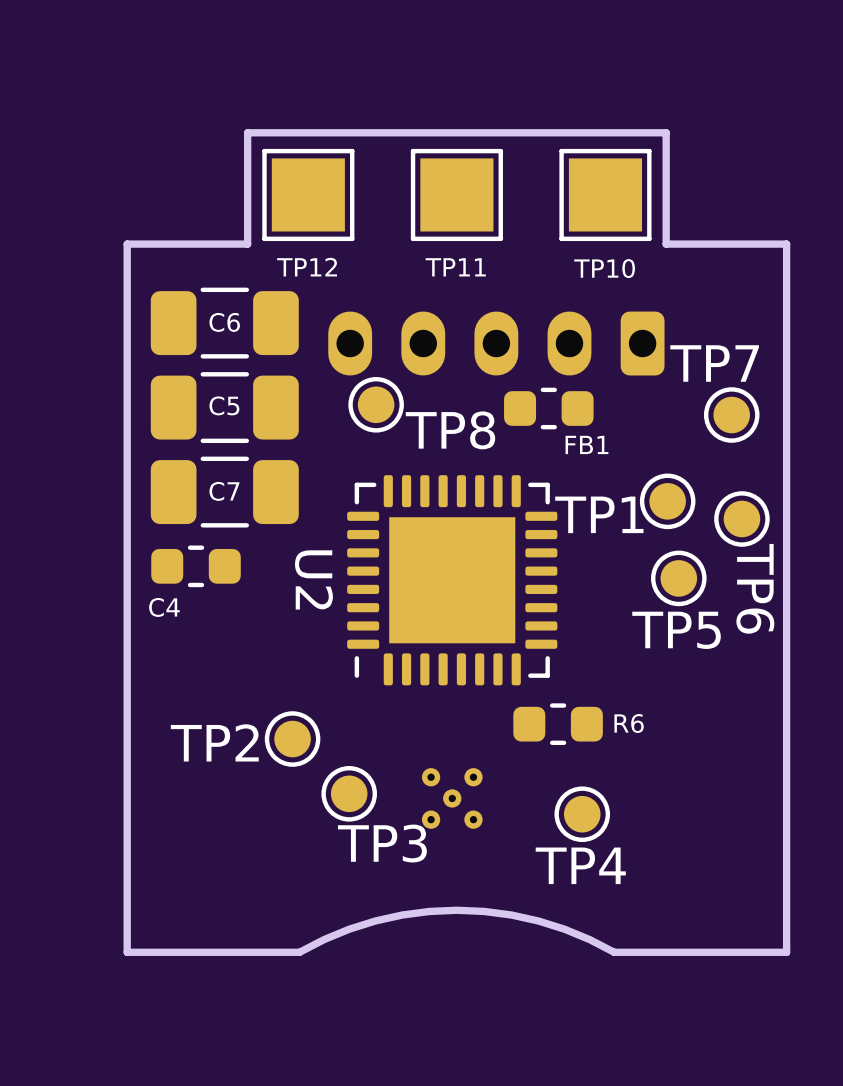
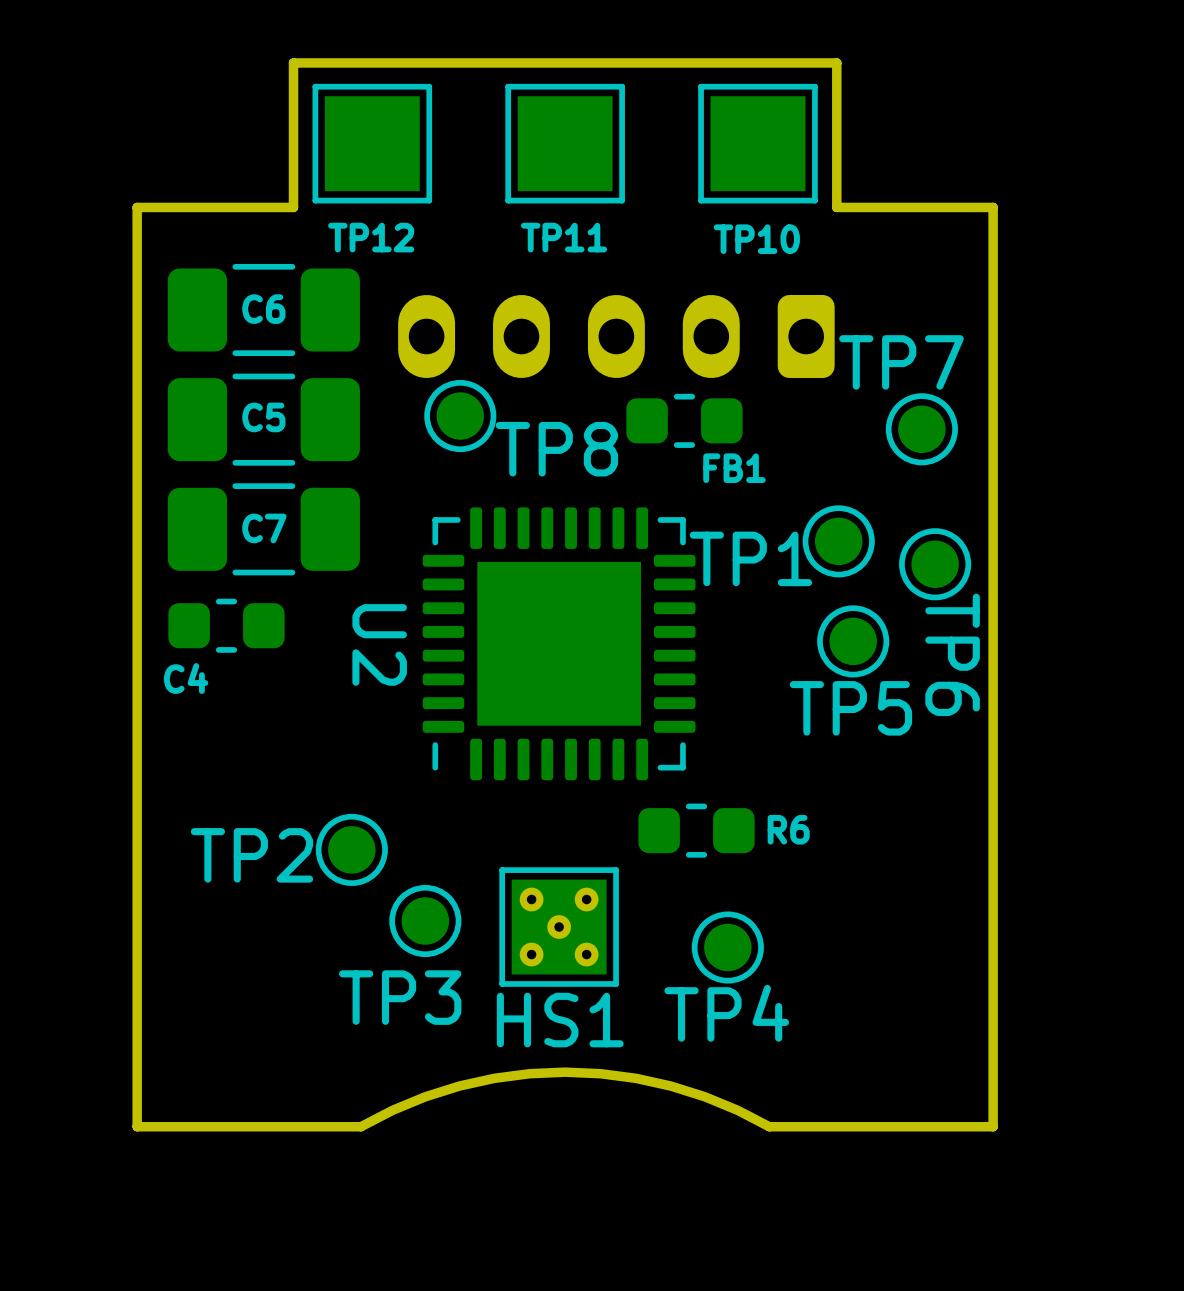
HS1: none -> (559, 927)
TP3 name position: TP3 (382, 843) -> TP3 (400, 997)

